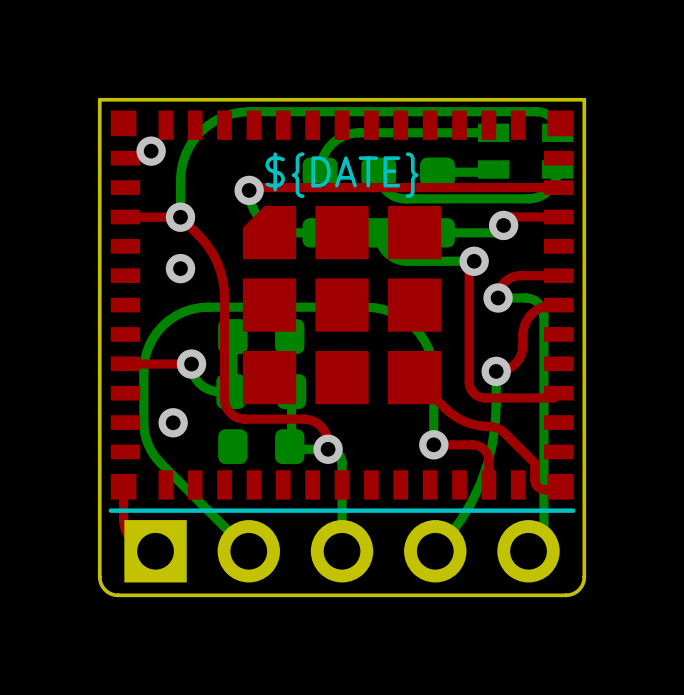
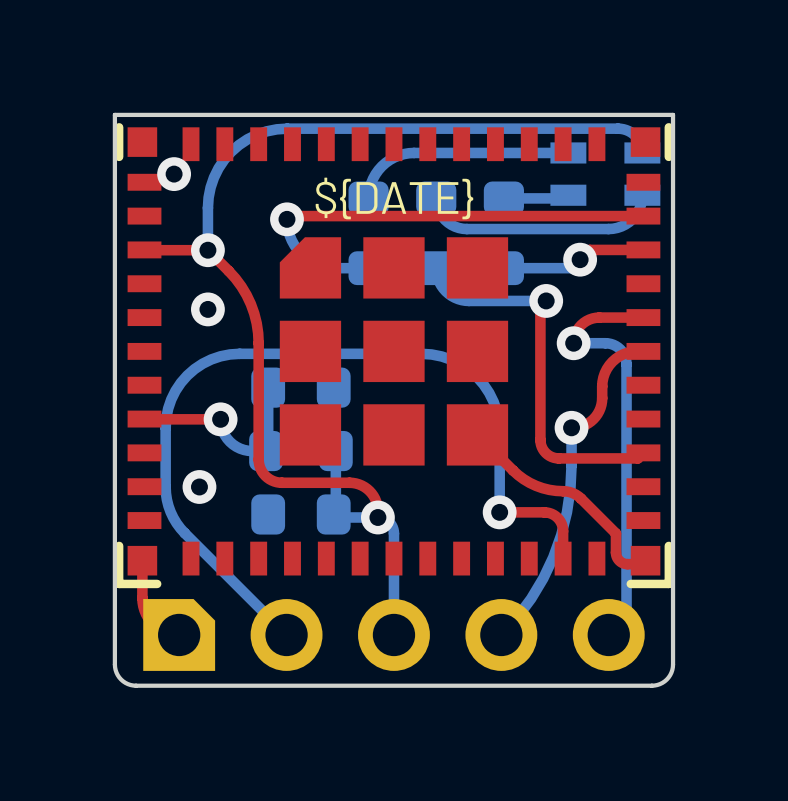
part footprint: [108, 110, 576, 513] -> [114, 123, 674, 589]
part footprint: [124, 520, 560, 583] -> [143, 599, 645, 671]

